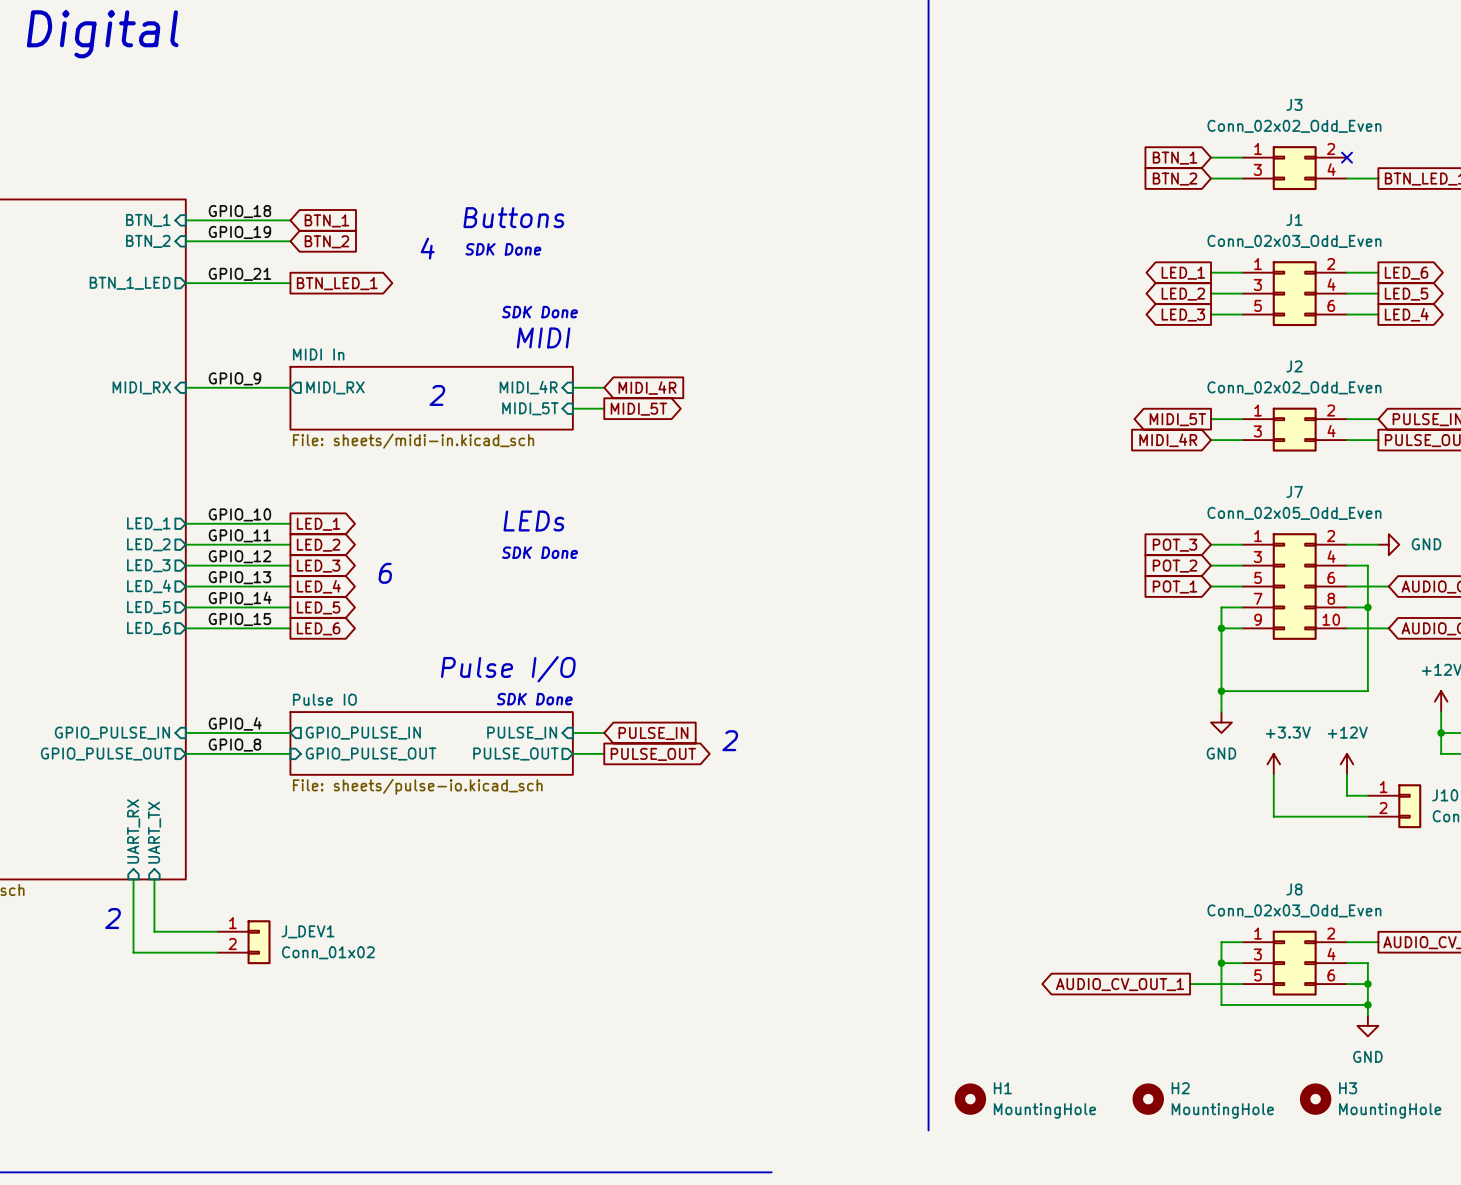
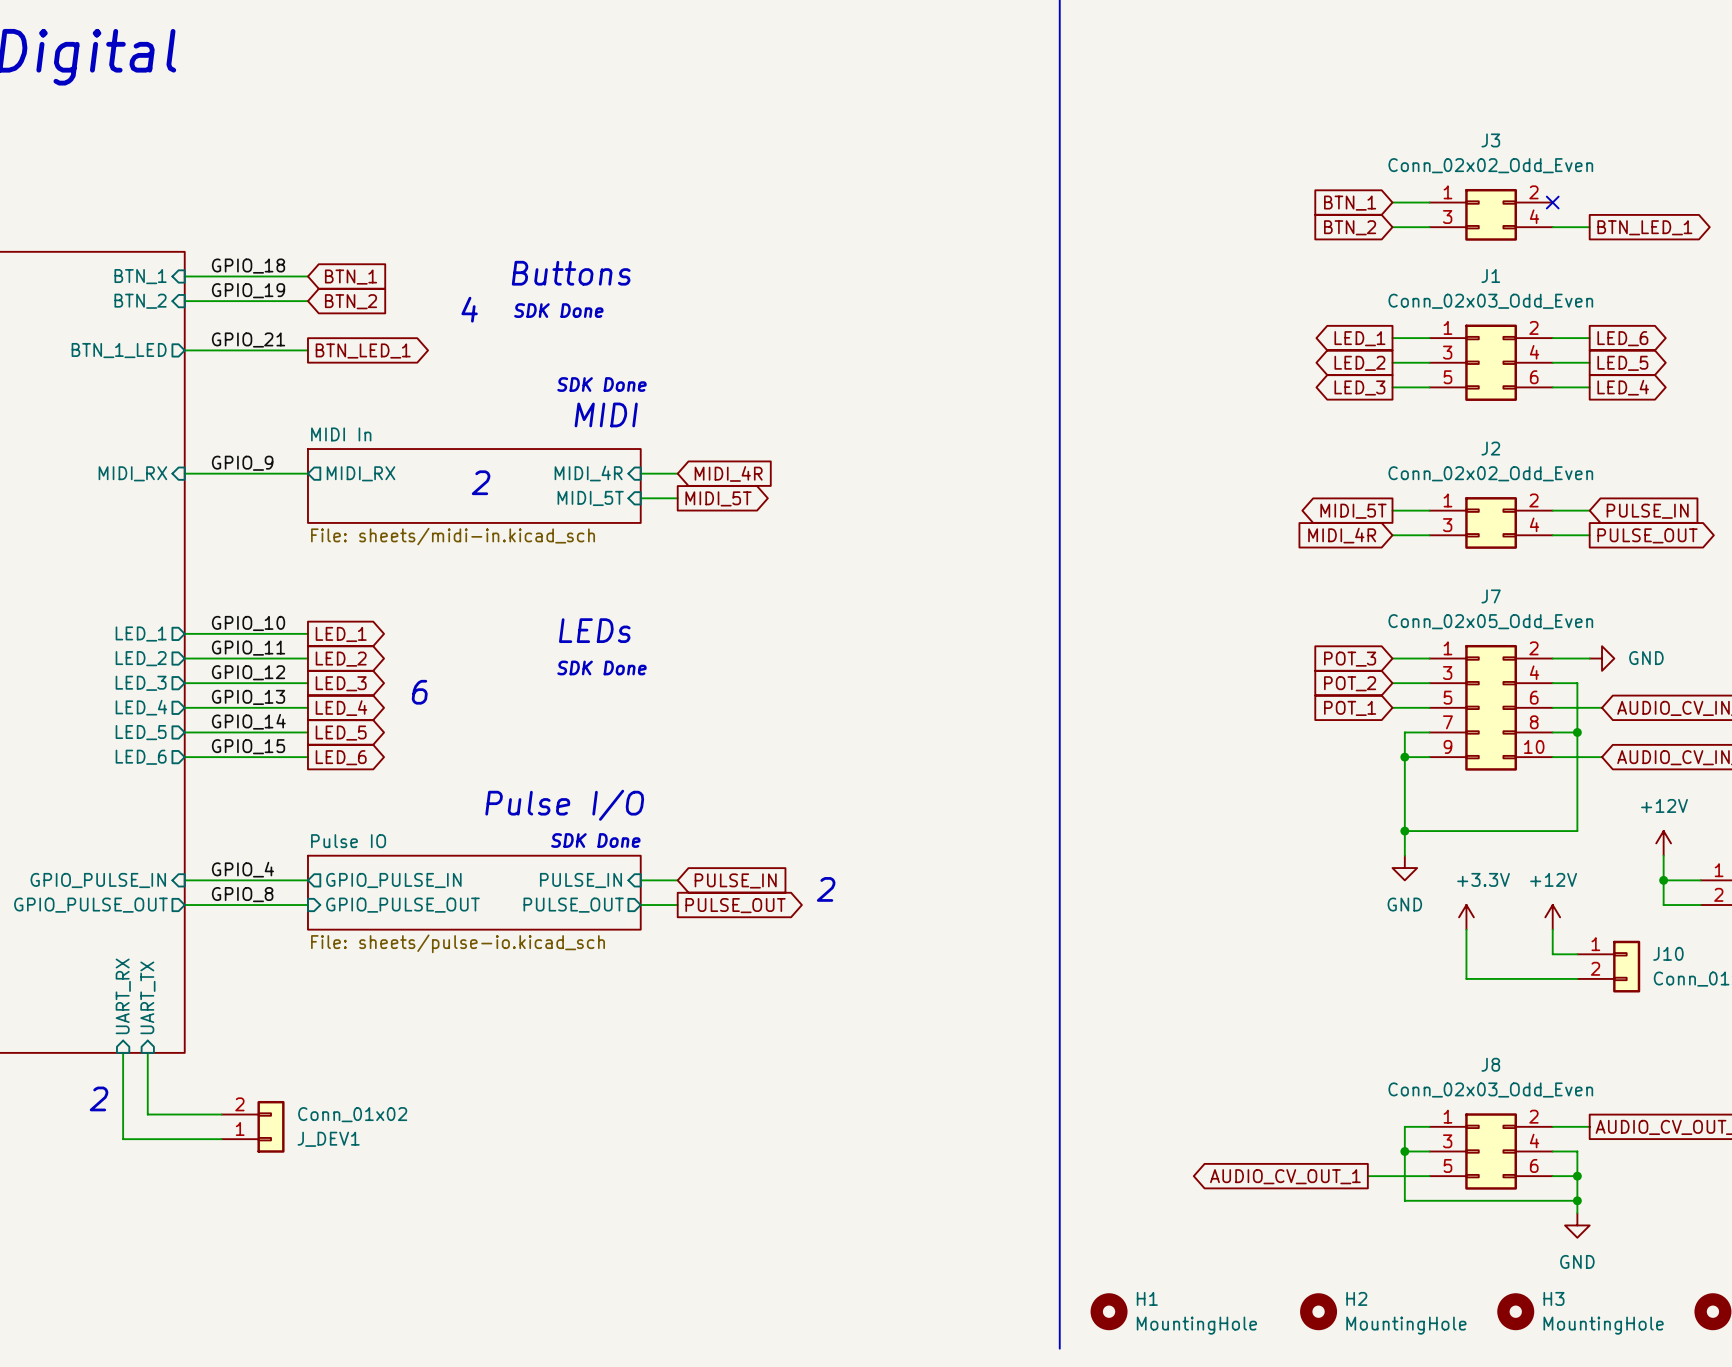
J_DEV1 flip: as is (259, 942) -> up-down (271, 1126)

